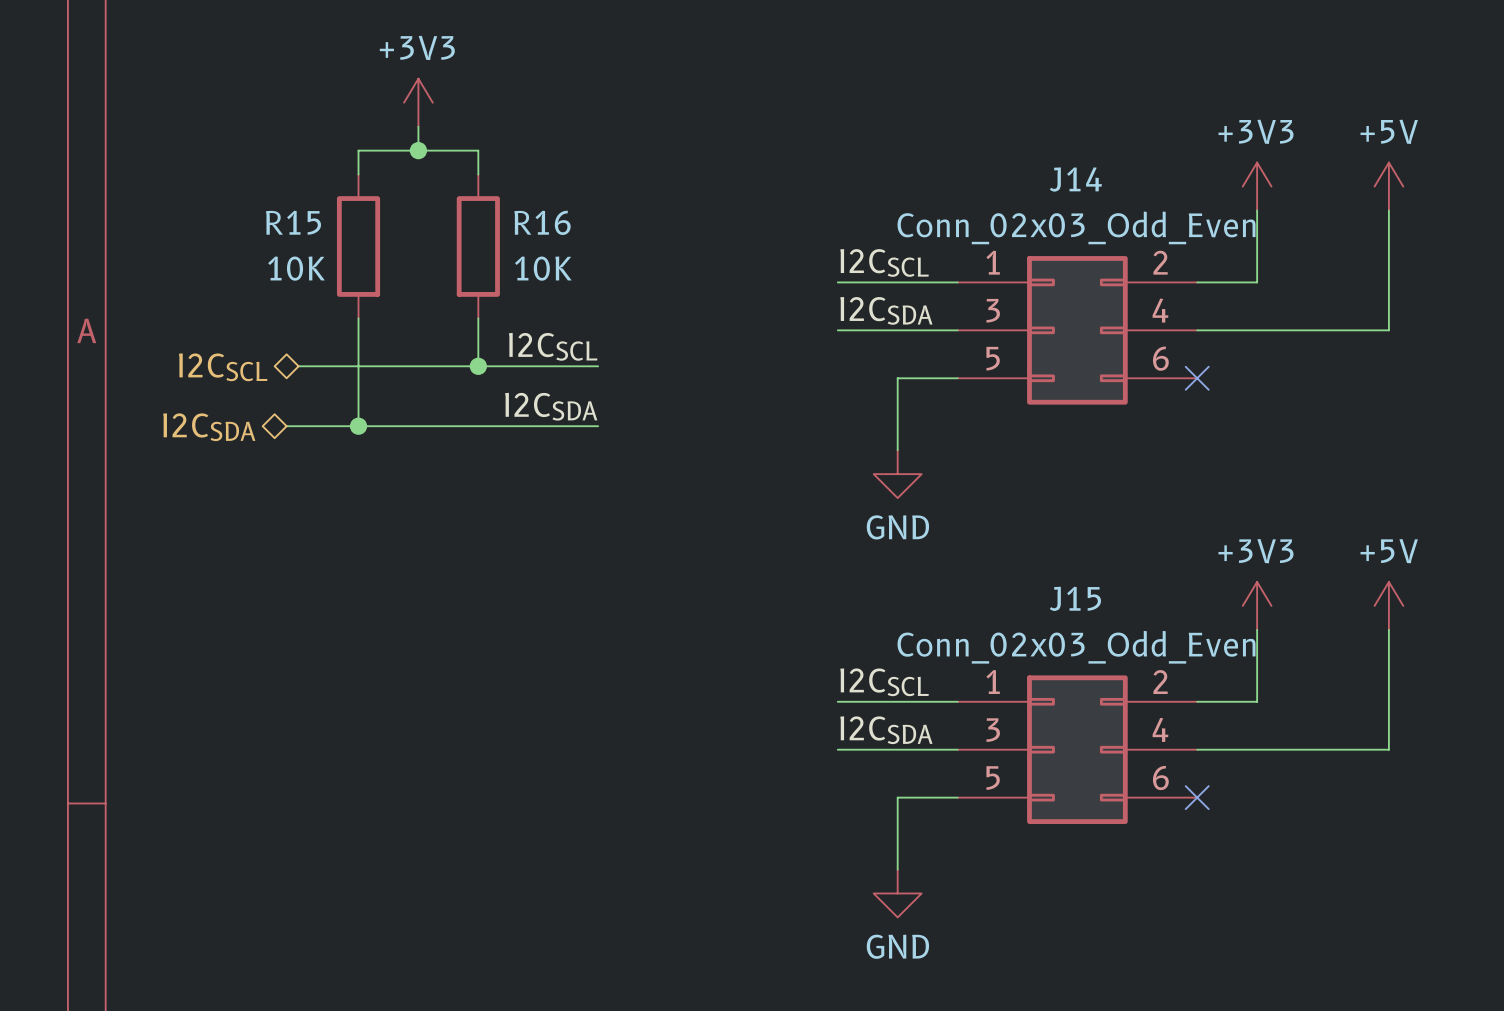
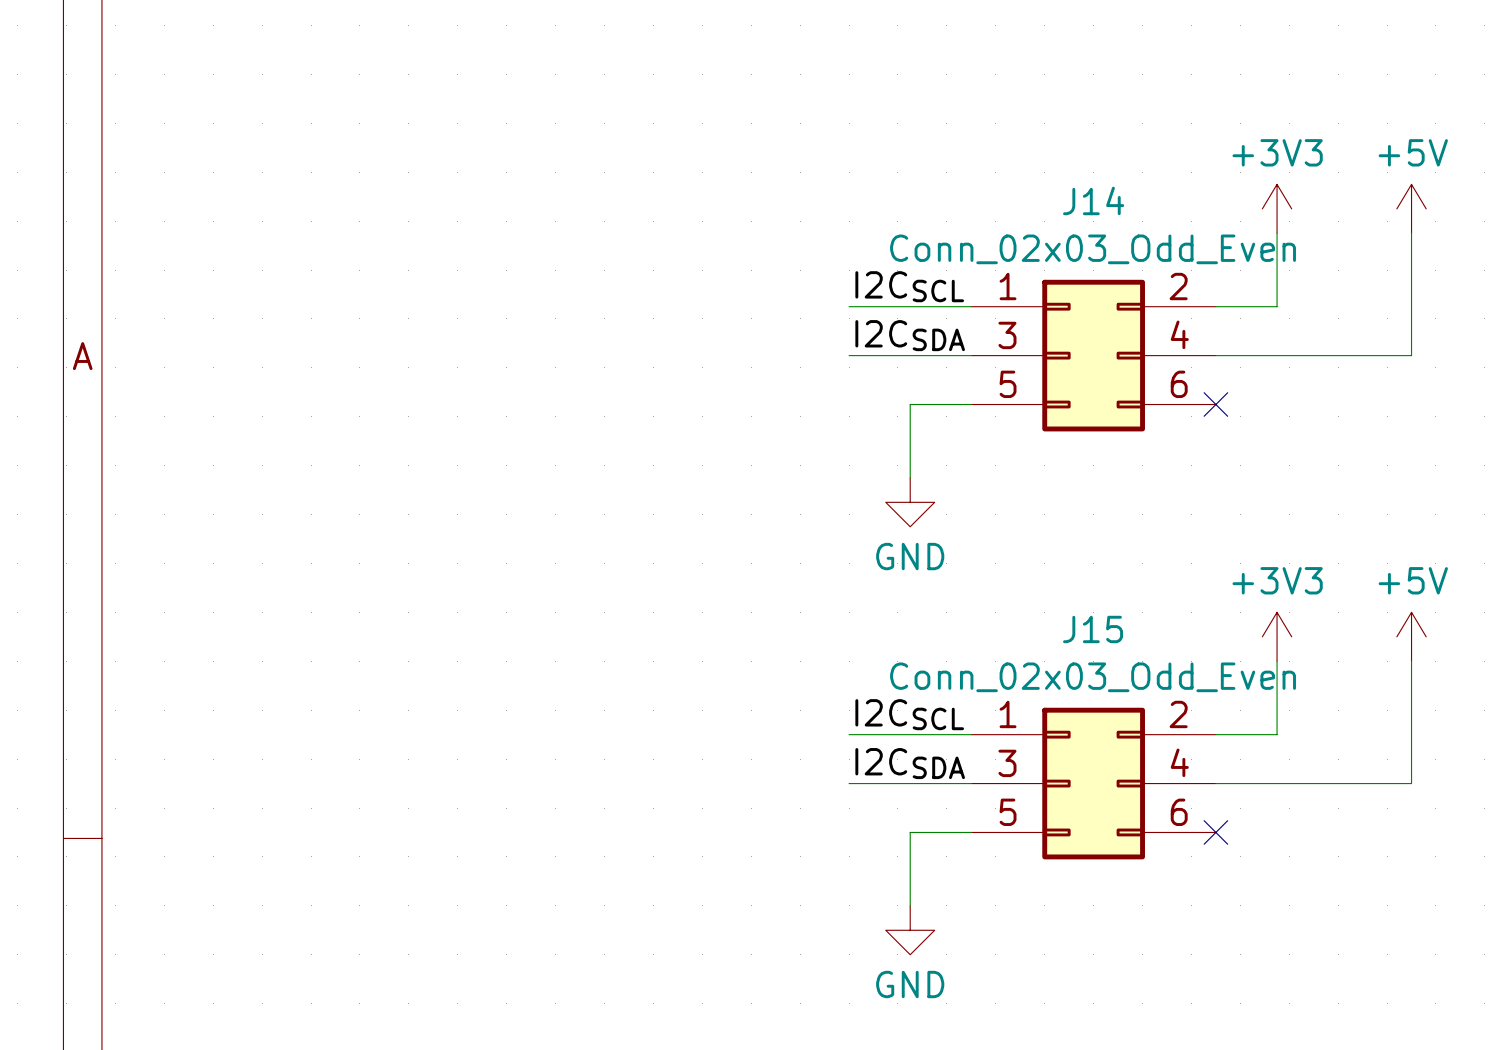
power symbol: +3V3 (418, 102) -> none
wire: (418, 126) (418, 150) -> none
junction: (418, 150) -> none
wire: (358, 174) (358, 150) (478, 150) (478, 174) -> none
R15: 10K (358, 246) -> none
R16: 10K (478, 246) -> none
wire: (358, 318) (358, 426) -> none
wire: (478, 318) (478, 366) -> none
label: I2CSCL (553, 346) -> none
wire: (298, 366) (598, 366) -> none
junction: (478, 366) -> none
hierarchical label: I2CSCL (223, 367) -> none
label: I2CSDA (551, 406) -> none
wire: (286, 426) (598, 426) -> none
junction: (358, 426) -> none
hierarchical label: I2CSDA (209, 427) -> none

